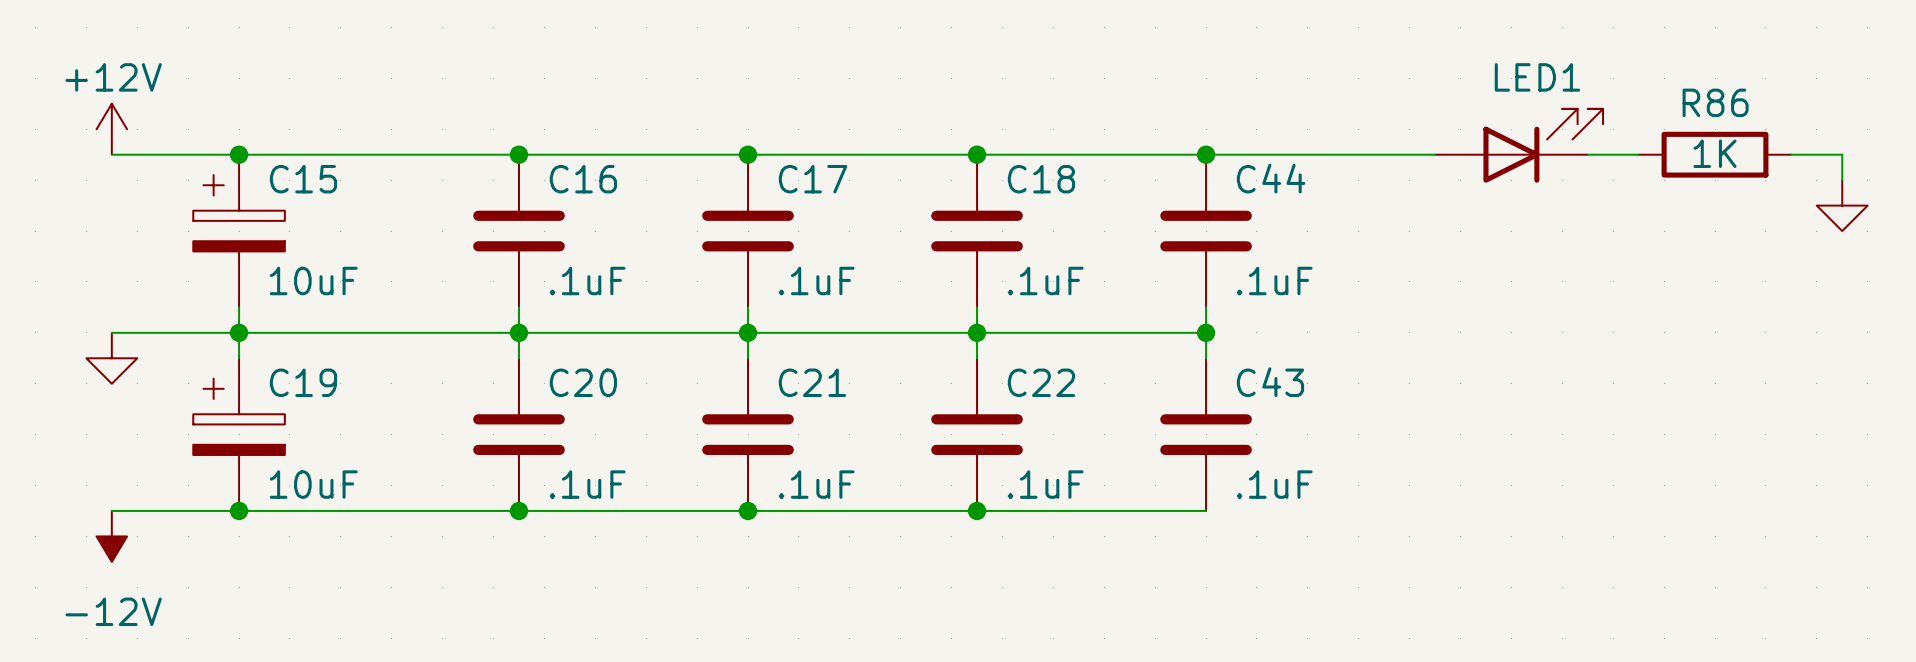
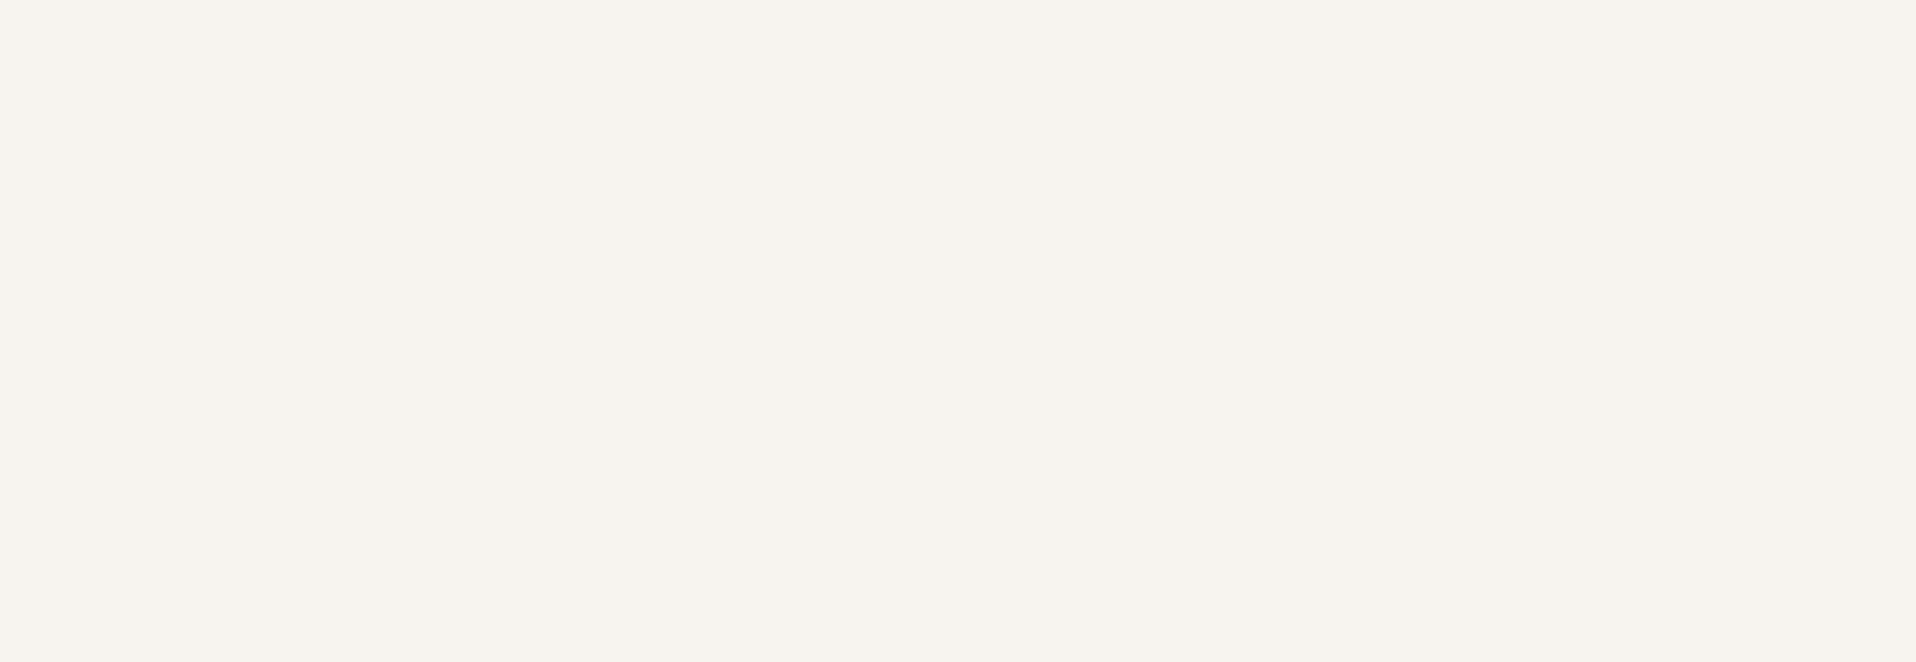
power symbol: +12V (111, 129) -> none
LED1: (1519, 145) -> none
wire: (111, 154) (1435, 154) -> none
junction: (239, 154) -> none
junction: (518, 154) -> none
junction: (748, 154) -> none
junction: (977, 154) -> none
junction: (1206, 154) -> none
wire: (1587, 154) (1638, 154) -> none
R86: 1K (1715, 154) -> none
wire: (1791, 154) (1842, 154) (1842, 180) -> none
power symbol: (1842, 205) -> none
C15: 10uF (239, 231) -> none
C16: .1uF (518, 231) -> none
C17: .1uF (748, 231) -> none
C18: .1uF (977, 231) -> none
C44: .1uF (1206, 231) -> none
wire: (239, 307) (239, 358) -> none
wire: (518, 307) (518, 358) -> none
wire: (748, 307) (748, 358) -> none
wire: (977, 307) (977, 358) -> none
wire: (1206, 307) (1206, 358) -> none
wire: (111, 332) (1206, 332) -> none
junction: (239, 332) -> none
junction: (518, 332) -> none
junction: (748, 332) -> none
junction: (977, 332) -> none
junction: (1206, 332) -> none
power symbol: (111, 358) -> none
C19: 10uF (239, 434) -> none
C20: .1uF (518, 434) -> none
C21: .1uF (748, 434) -> none
C22: .1uF (977, 434) -> none
C43: .1uF (1206, 434) -> none
wire: (111, 510) (1206, 510) -> none
junction: (239, 510) -> none
junction: (518, 510) -> none
junction: (748, 510) -> none
junction: (977, 510) -> none
power symbol: -12V (111, 536) -> none

